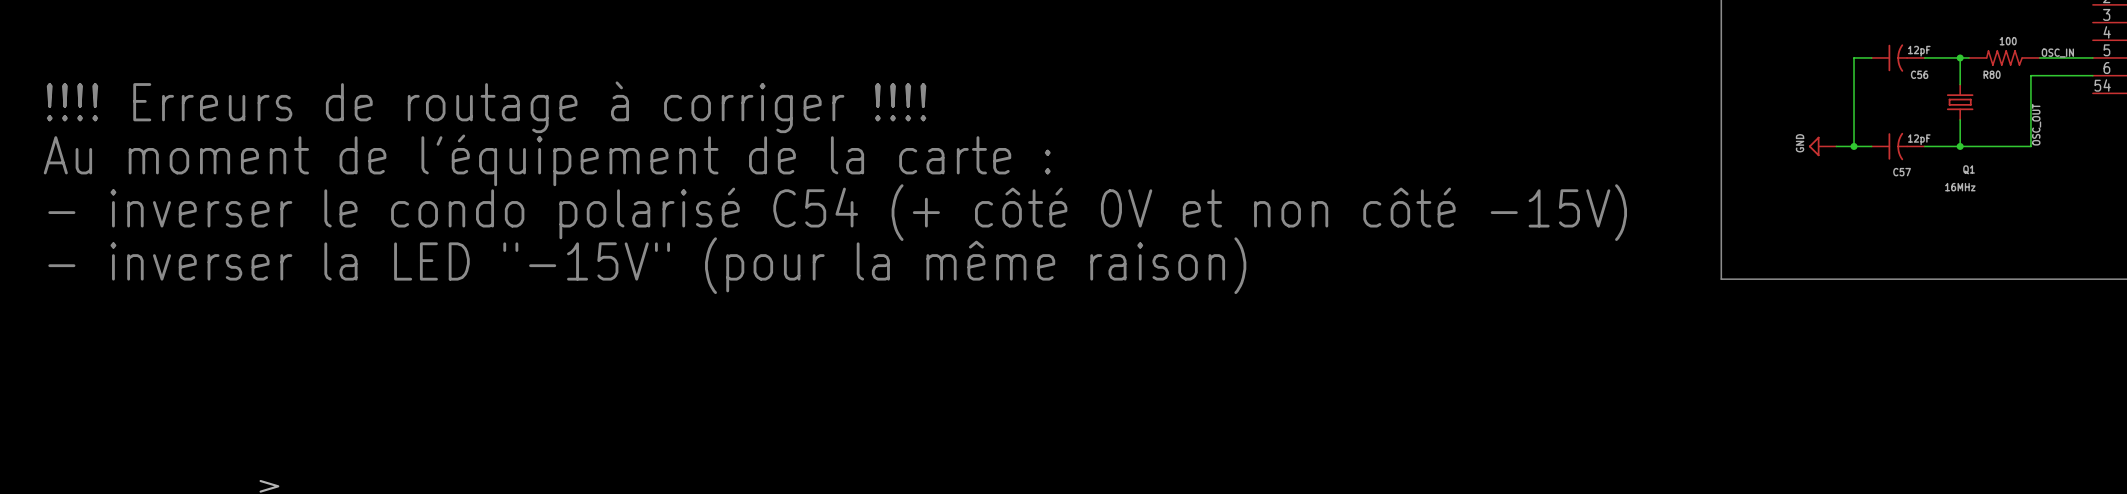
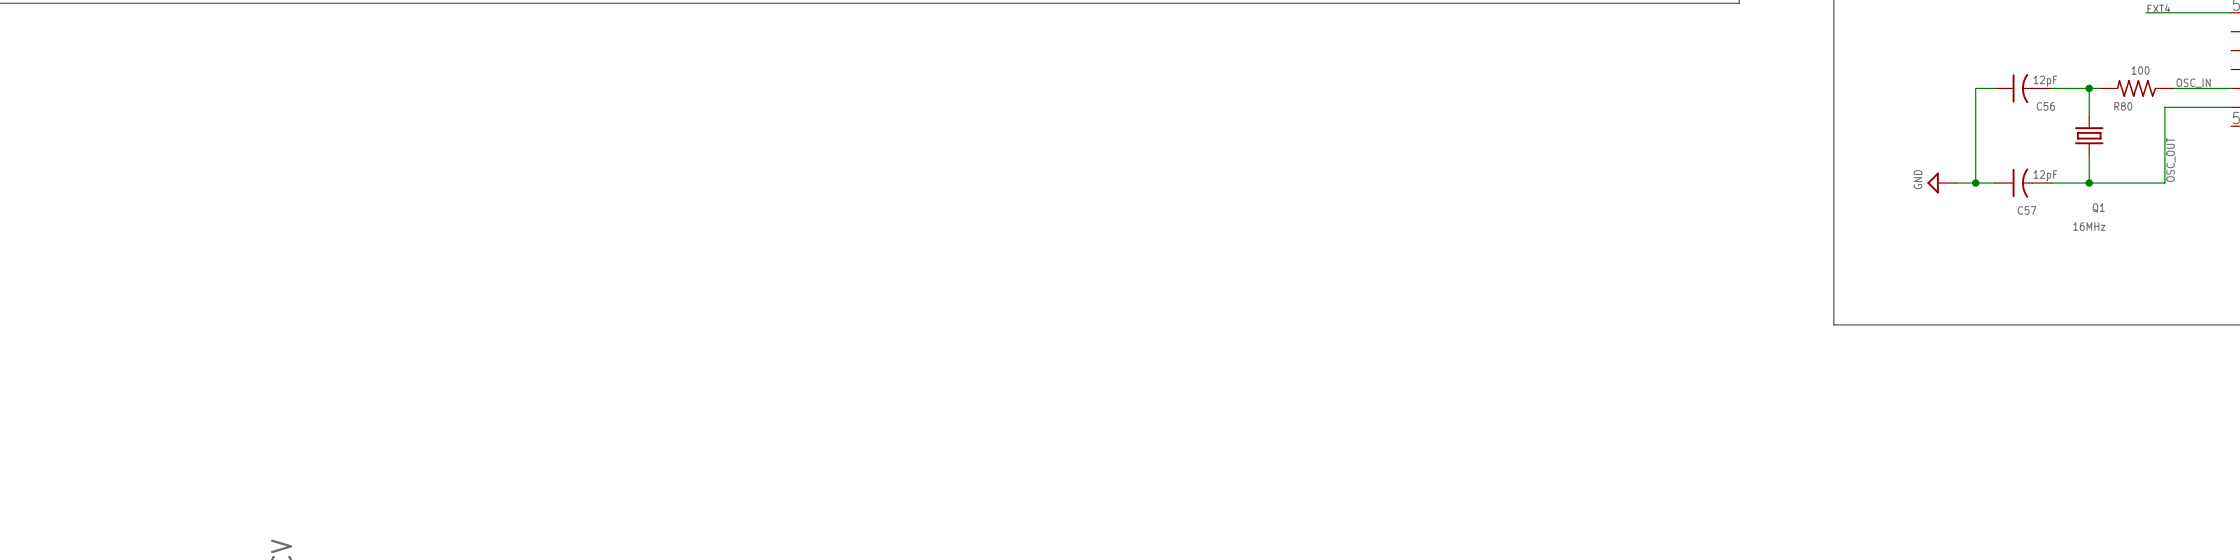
text: !!!! Erreurs de routage à corriger !!!! (486, 107) -> none
text: Au moment de l'équipement de la carte : (547, 160) -> none
text: - inverser le condo polarisé C54 (+ côté 0V et non côté -15V) (837, 212) -> none
text: - inverser la LED "-15V" (pour la même raison) (647, 265) -> none

